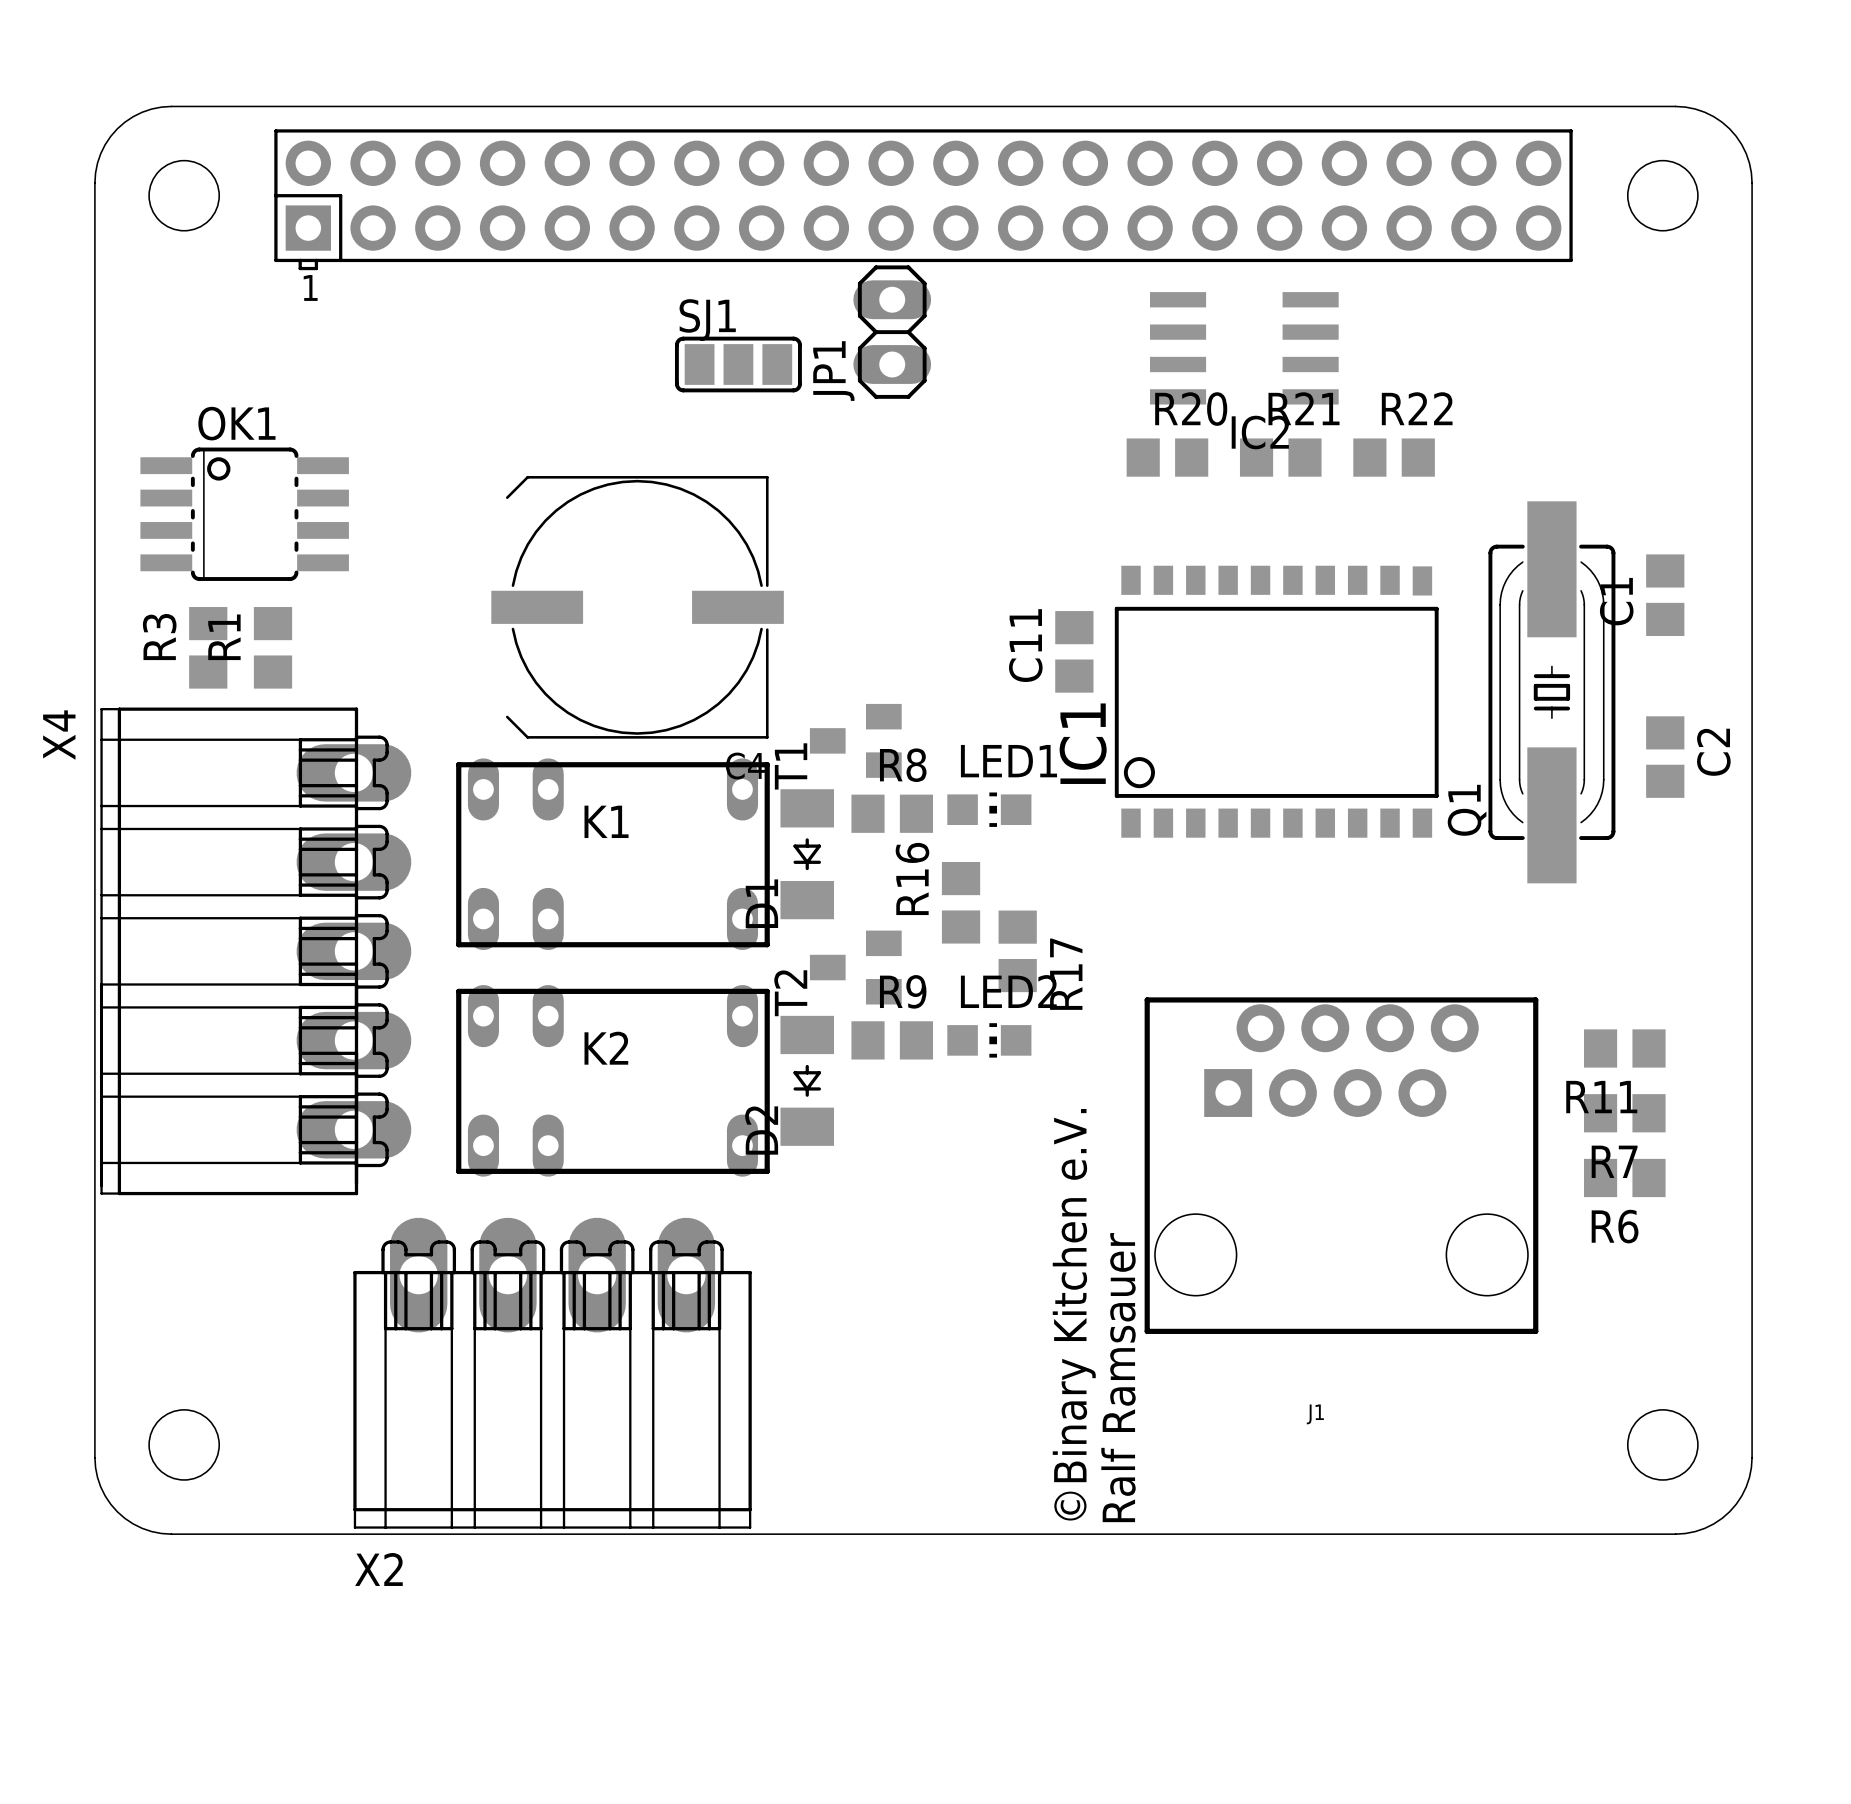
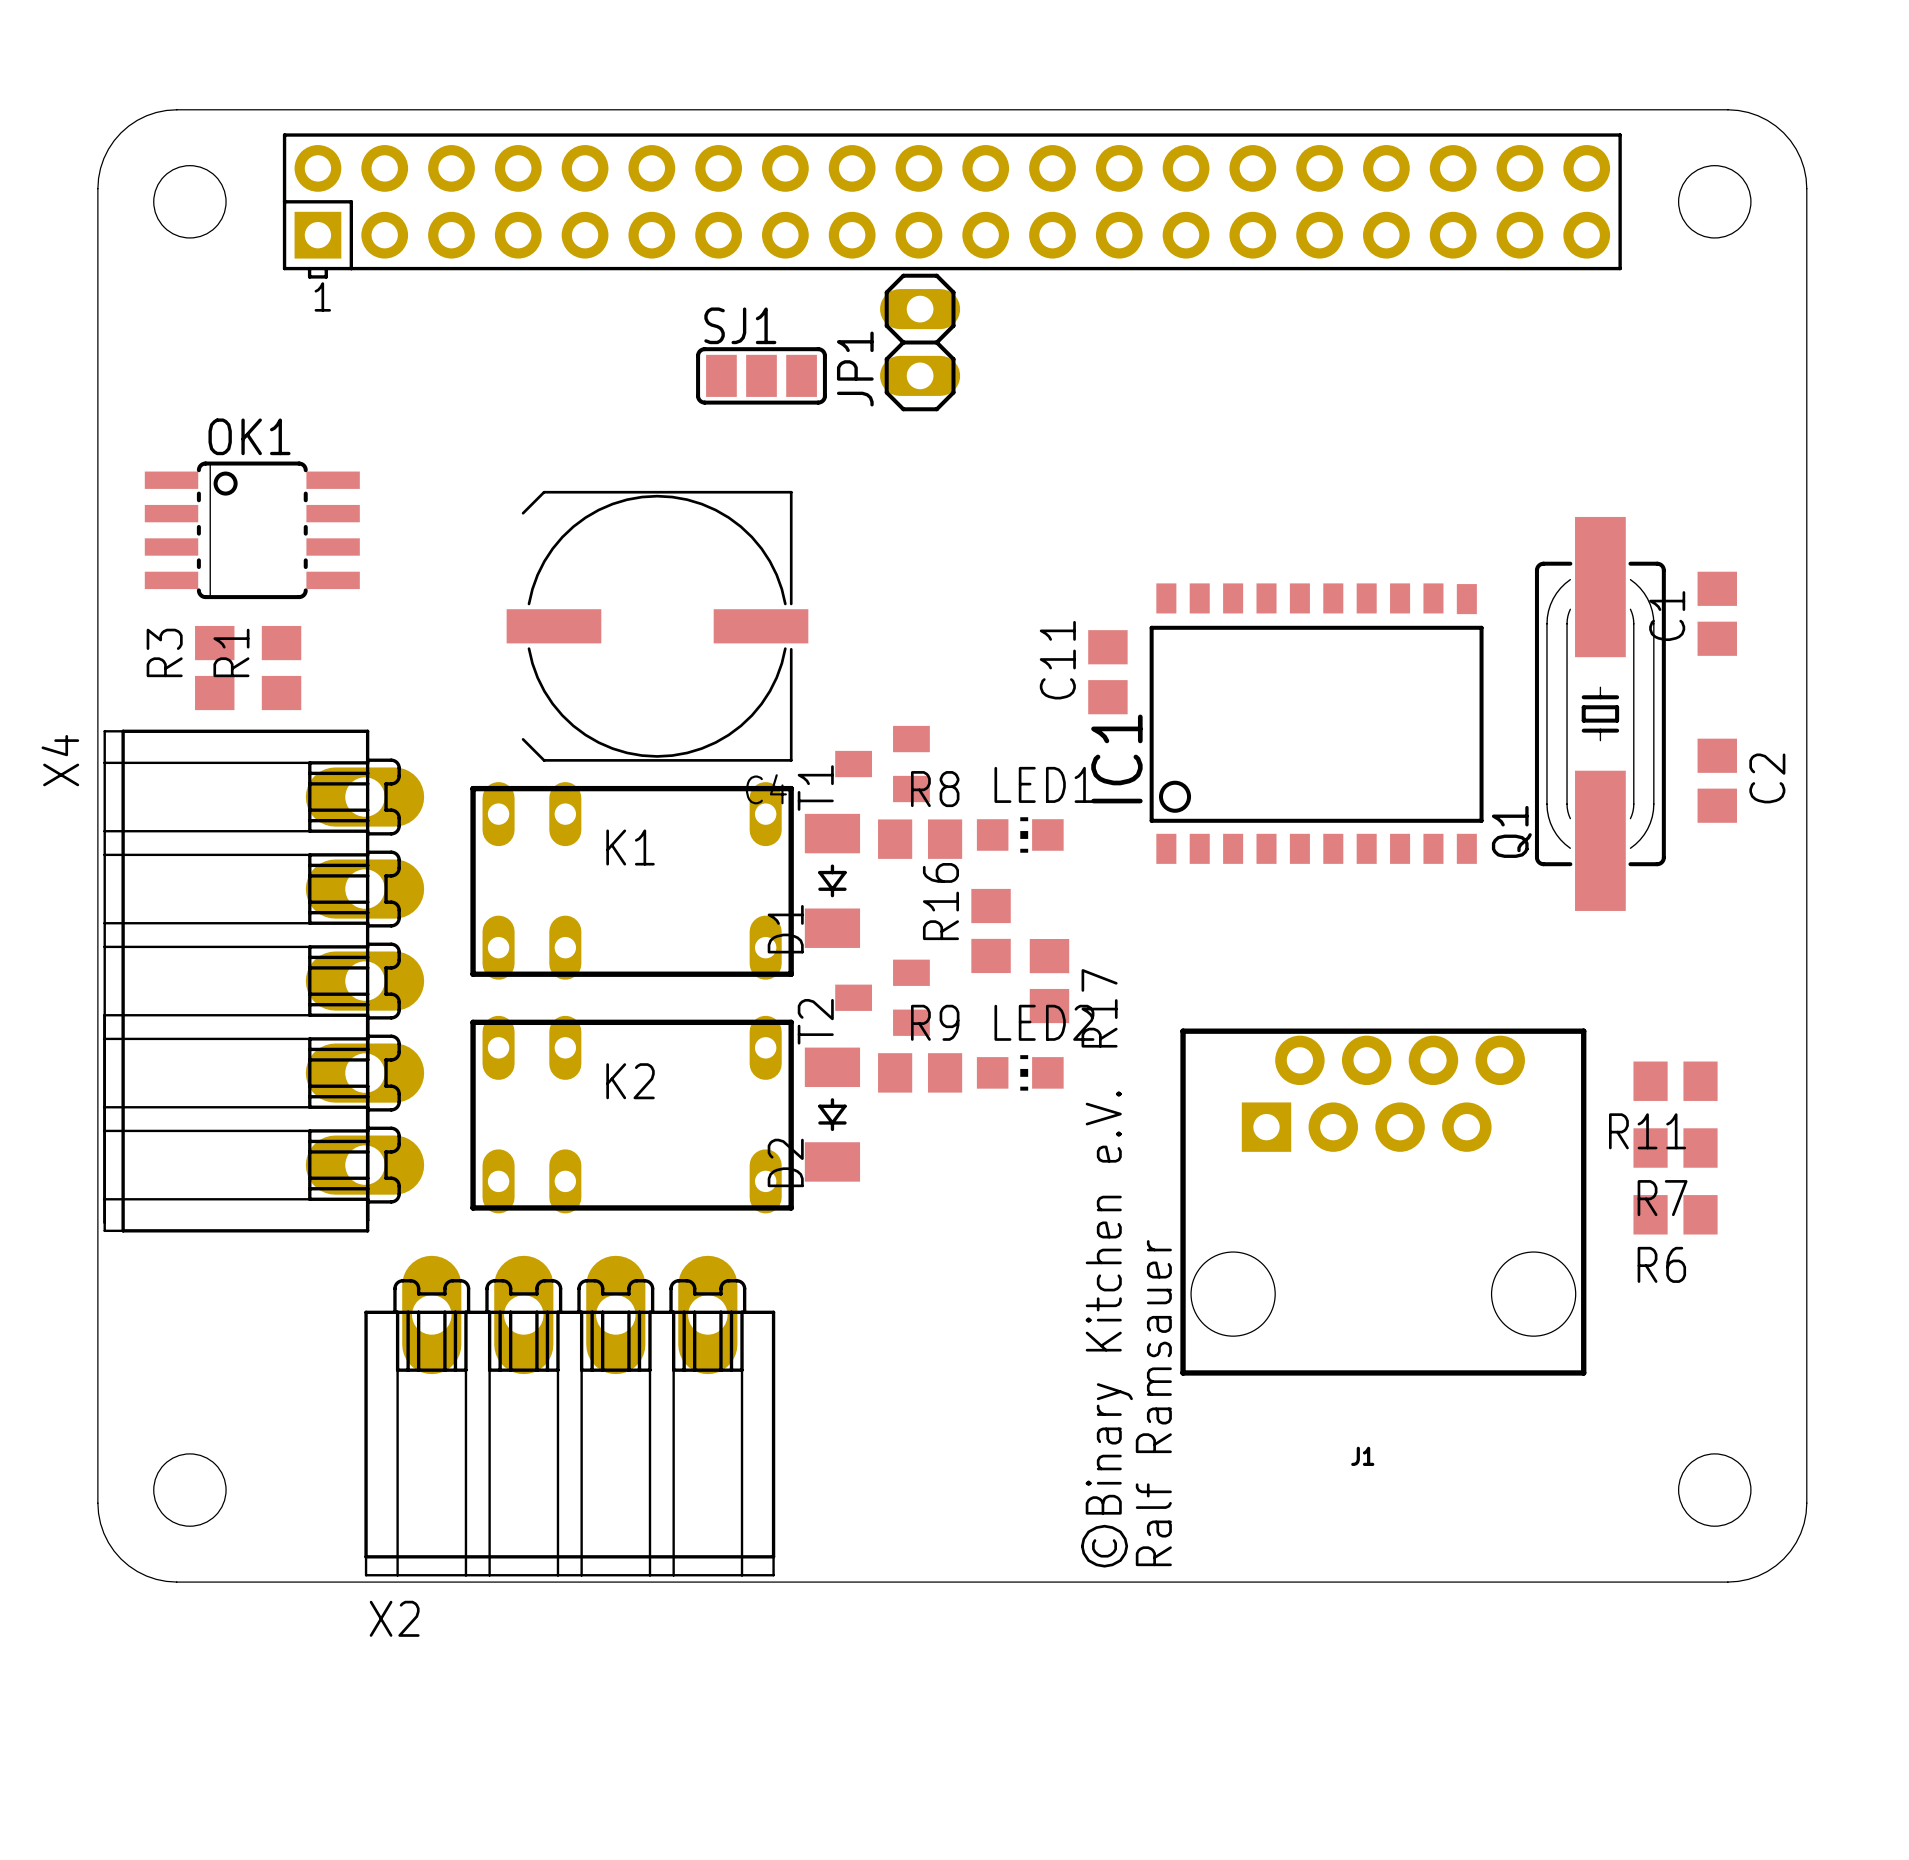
IC2: (1244, 348) -> none
R20: (1167, 457) -> none
R21: (1280, 457) -> none
R22: (1394, 457) -> none

